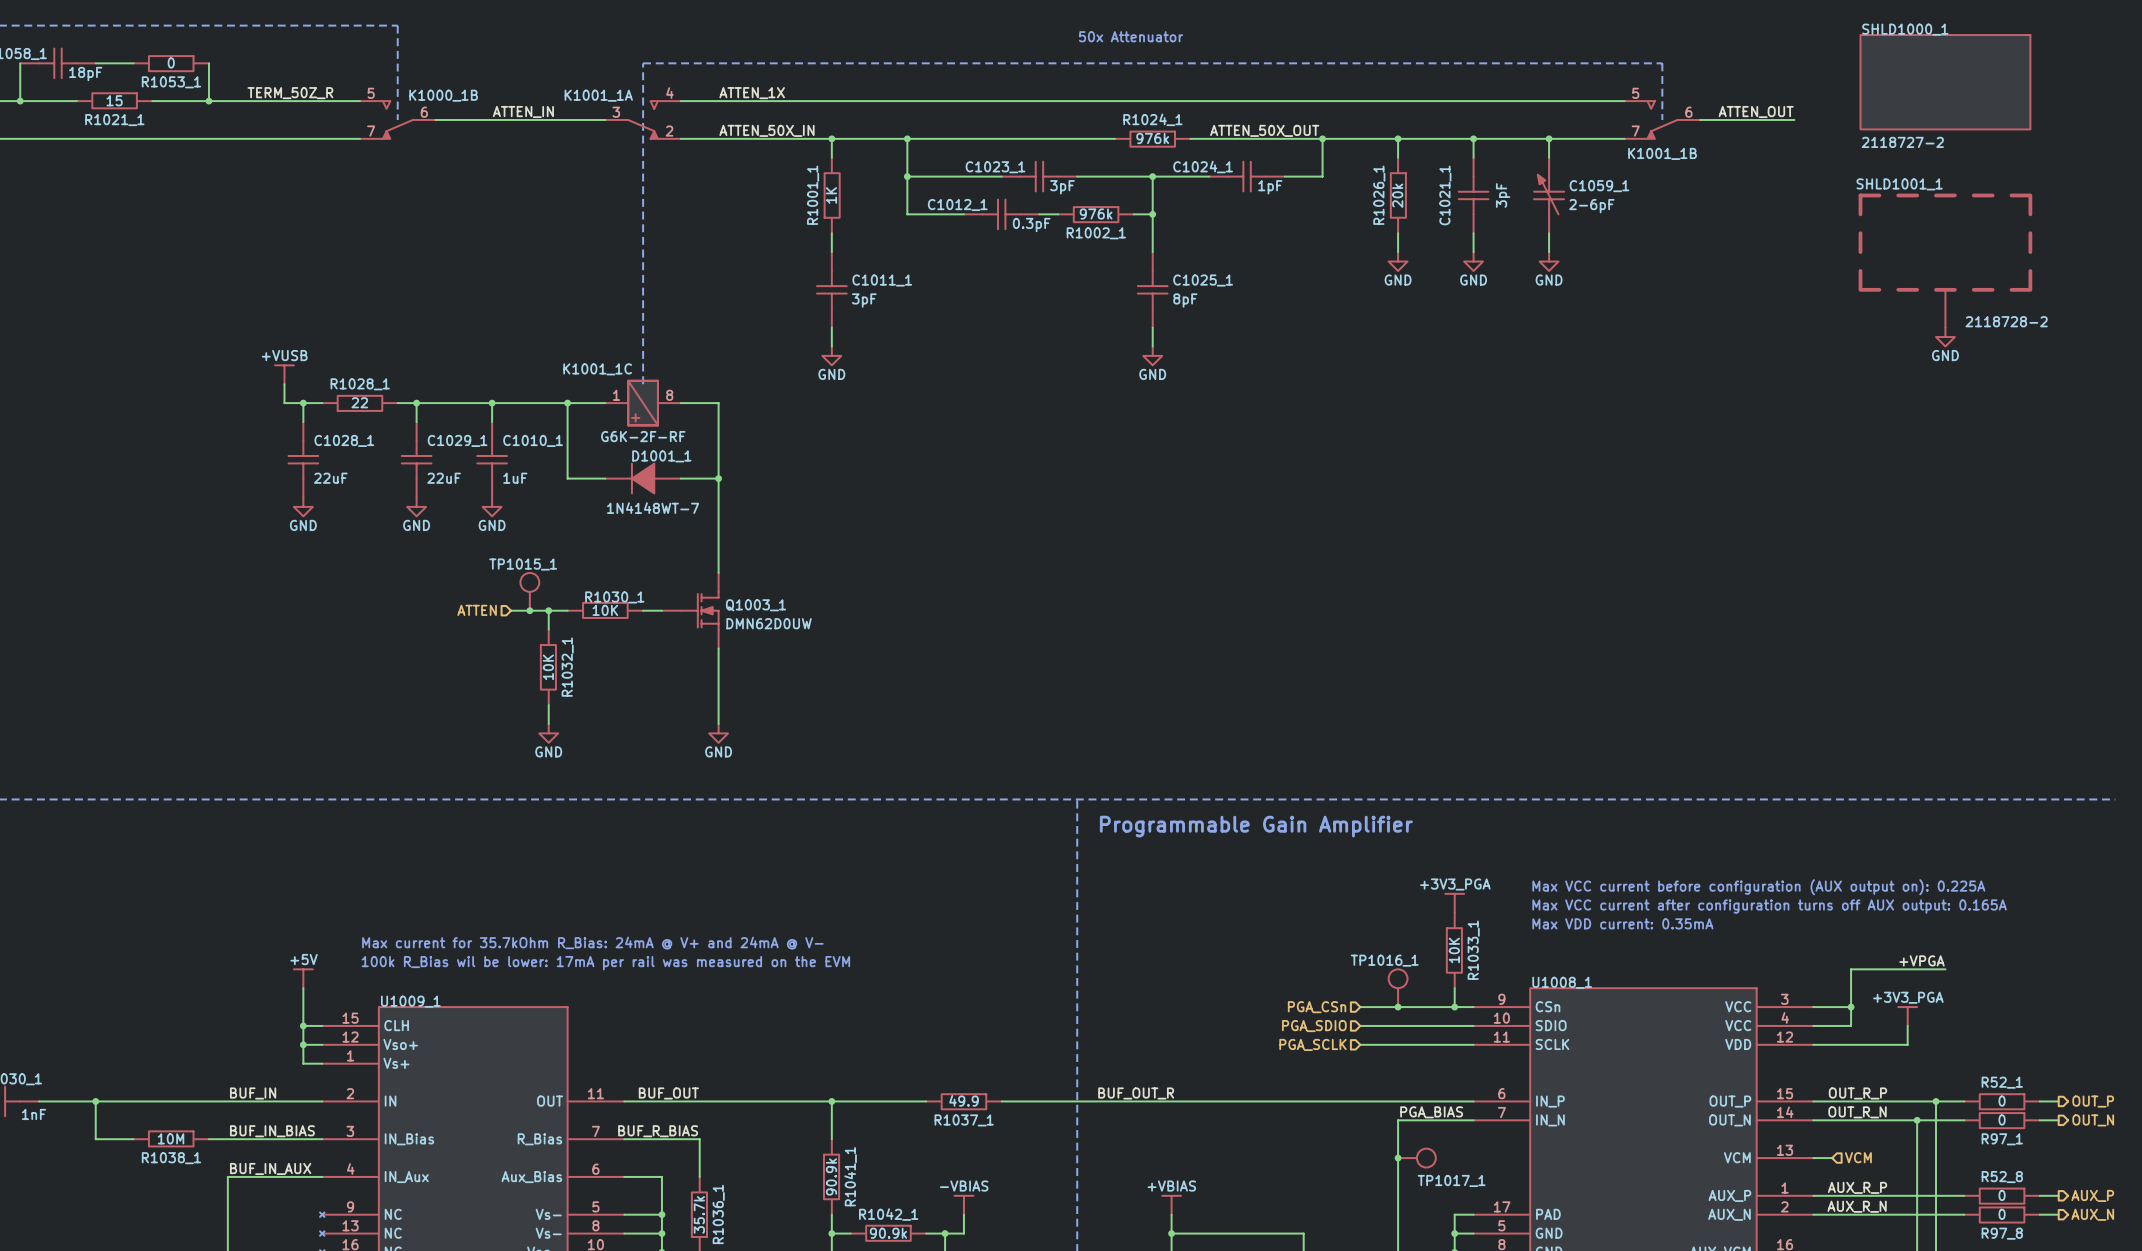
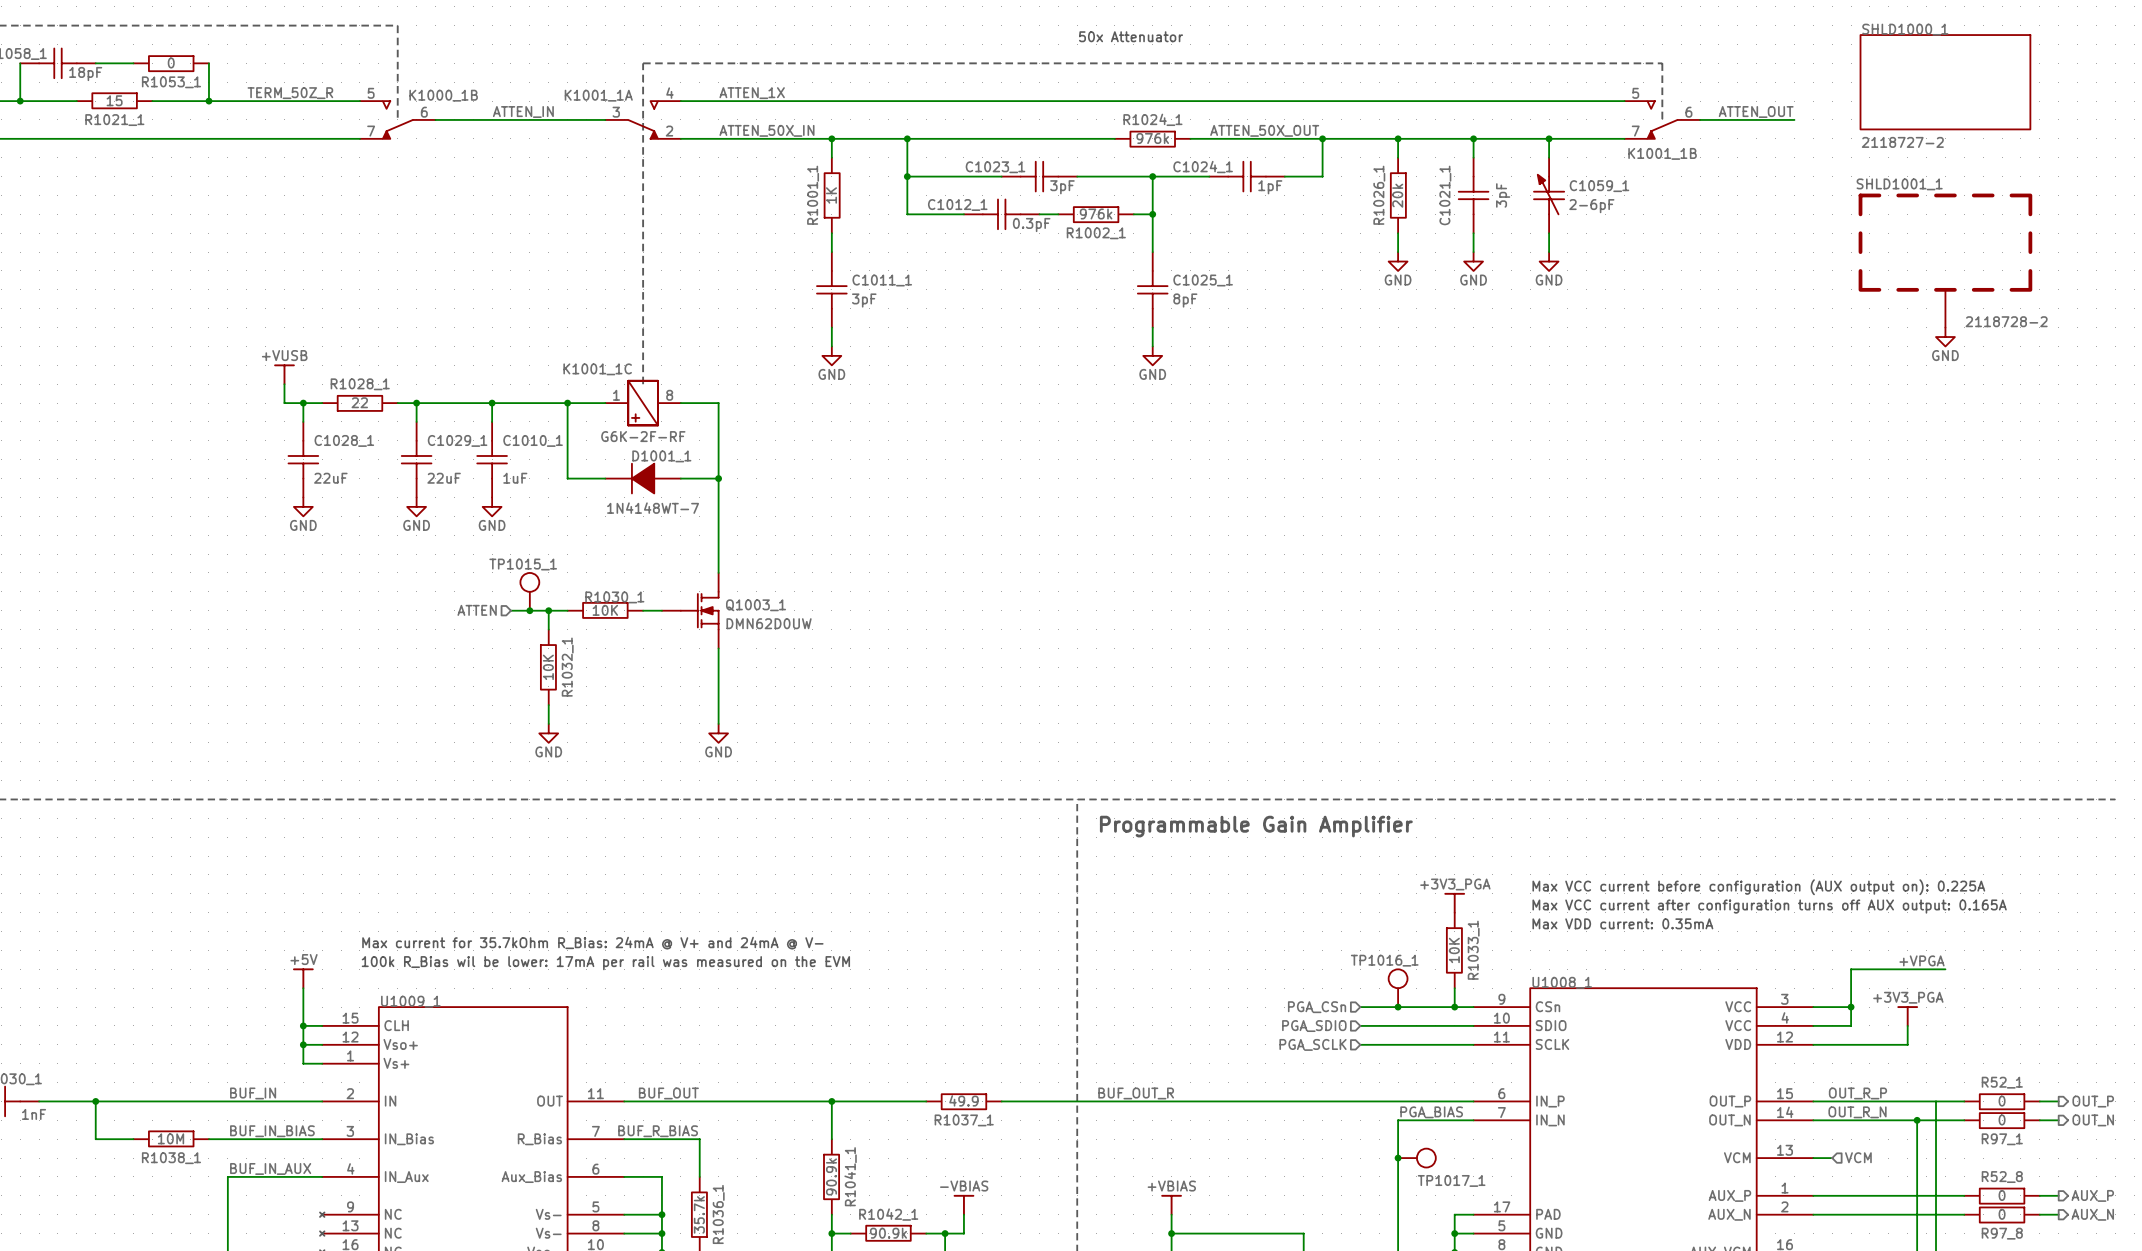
junction: (1936, 1101) -> none
label: AUX_R_P (1857, 1187) -> none
label: AUX_R_N (1857, 1206) -> none

